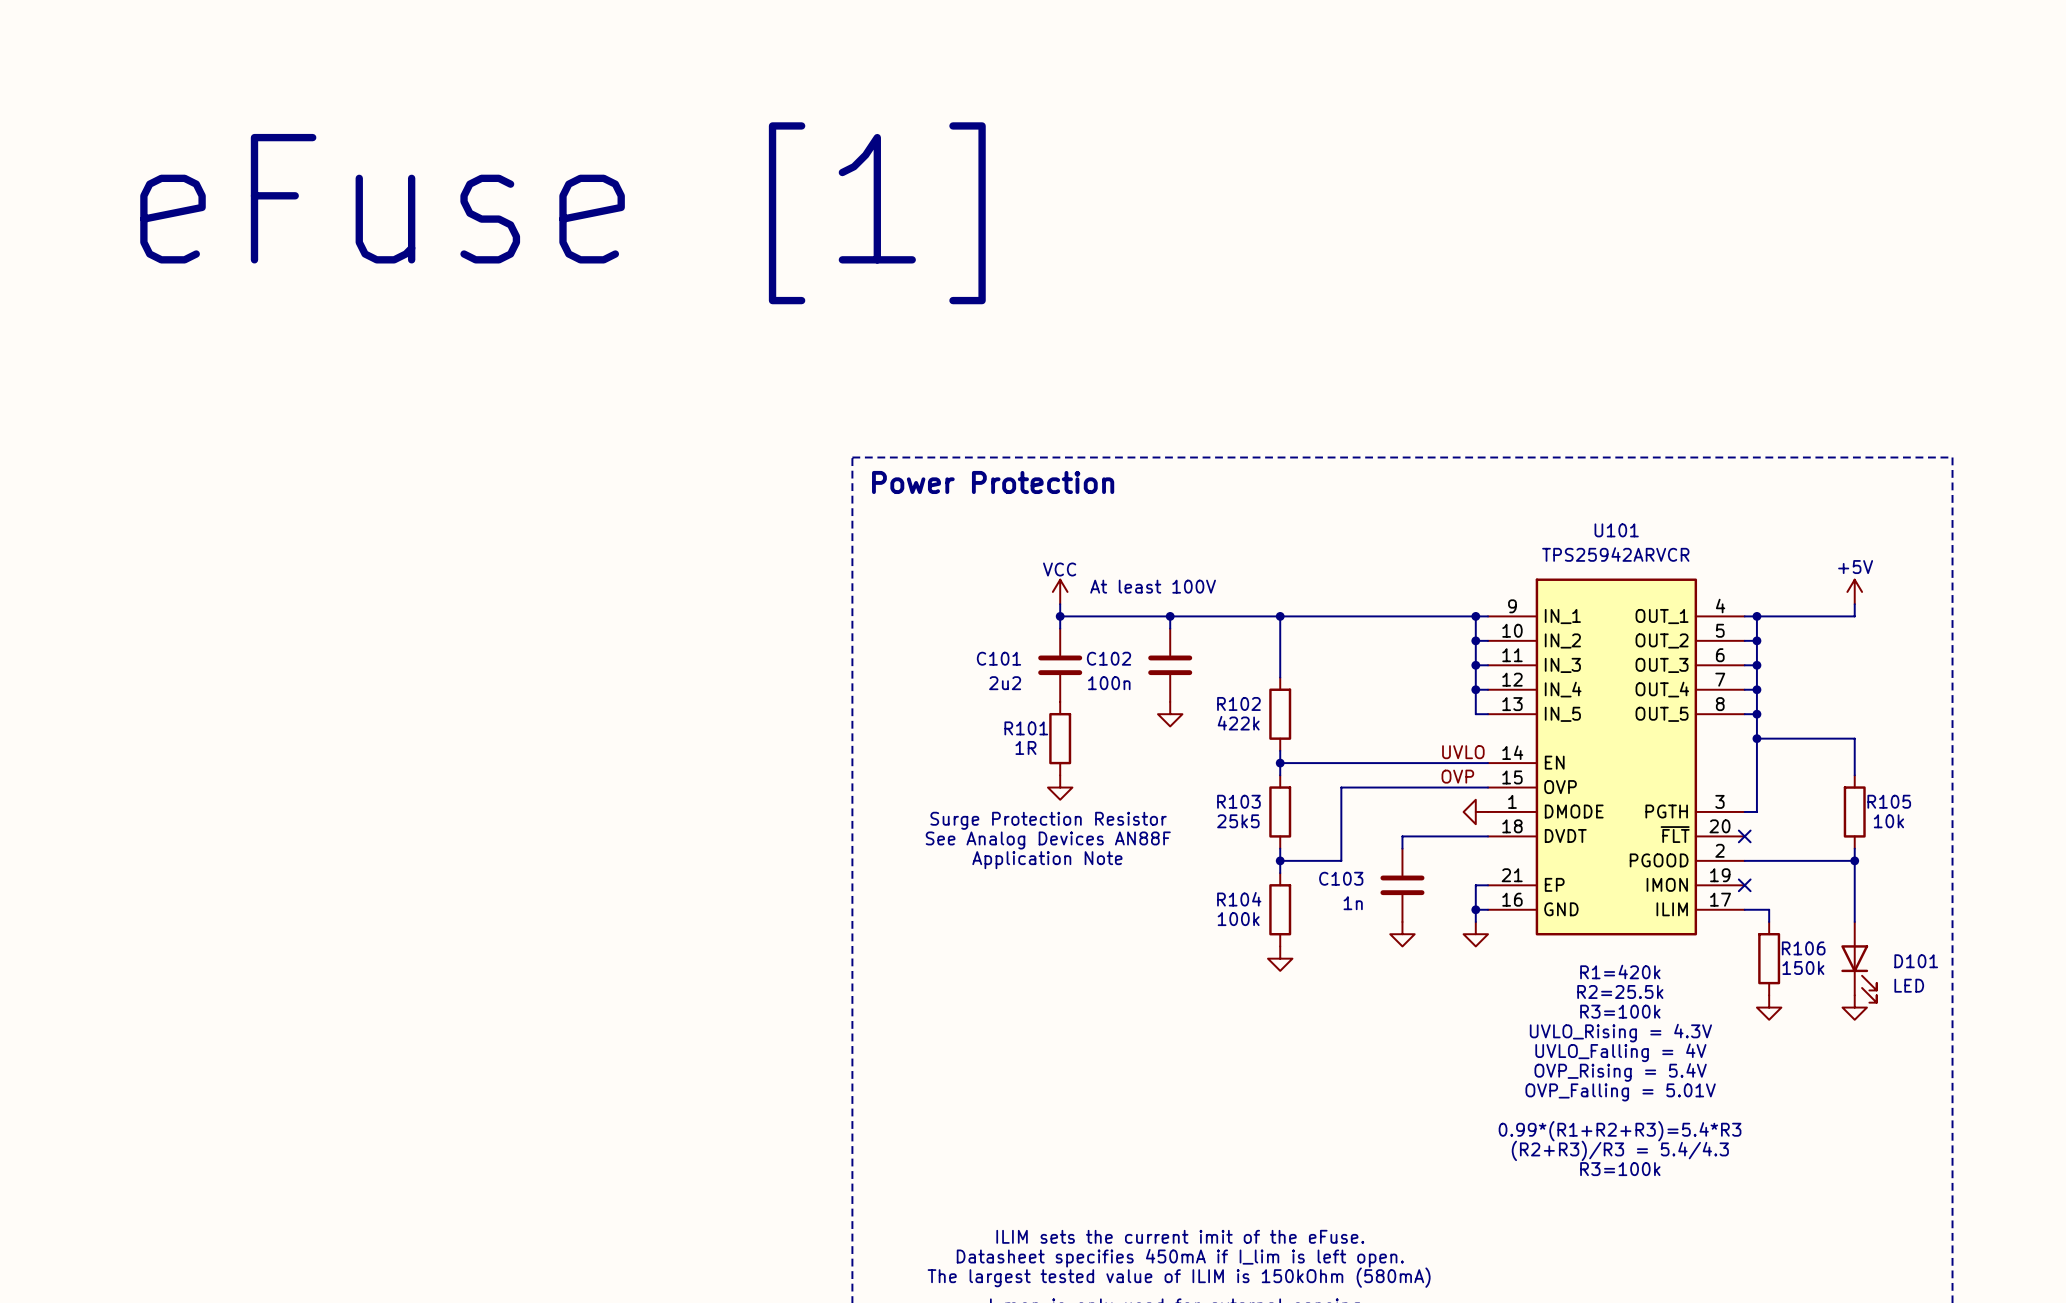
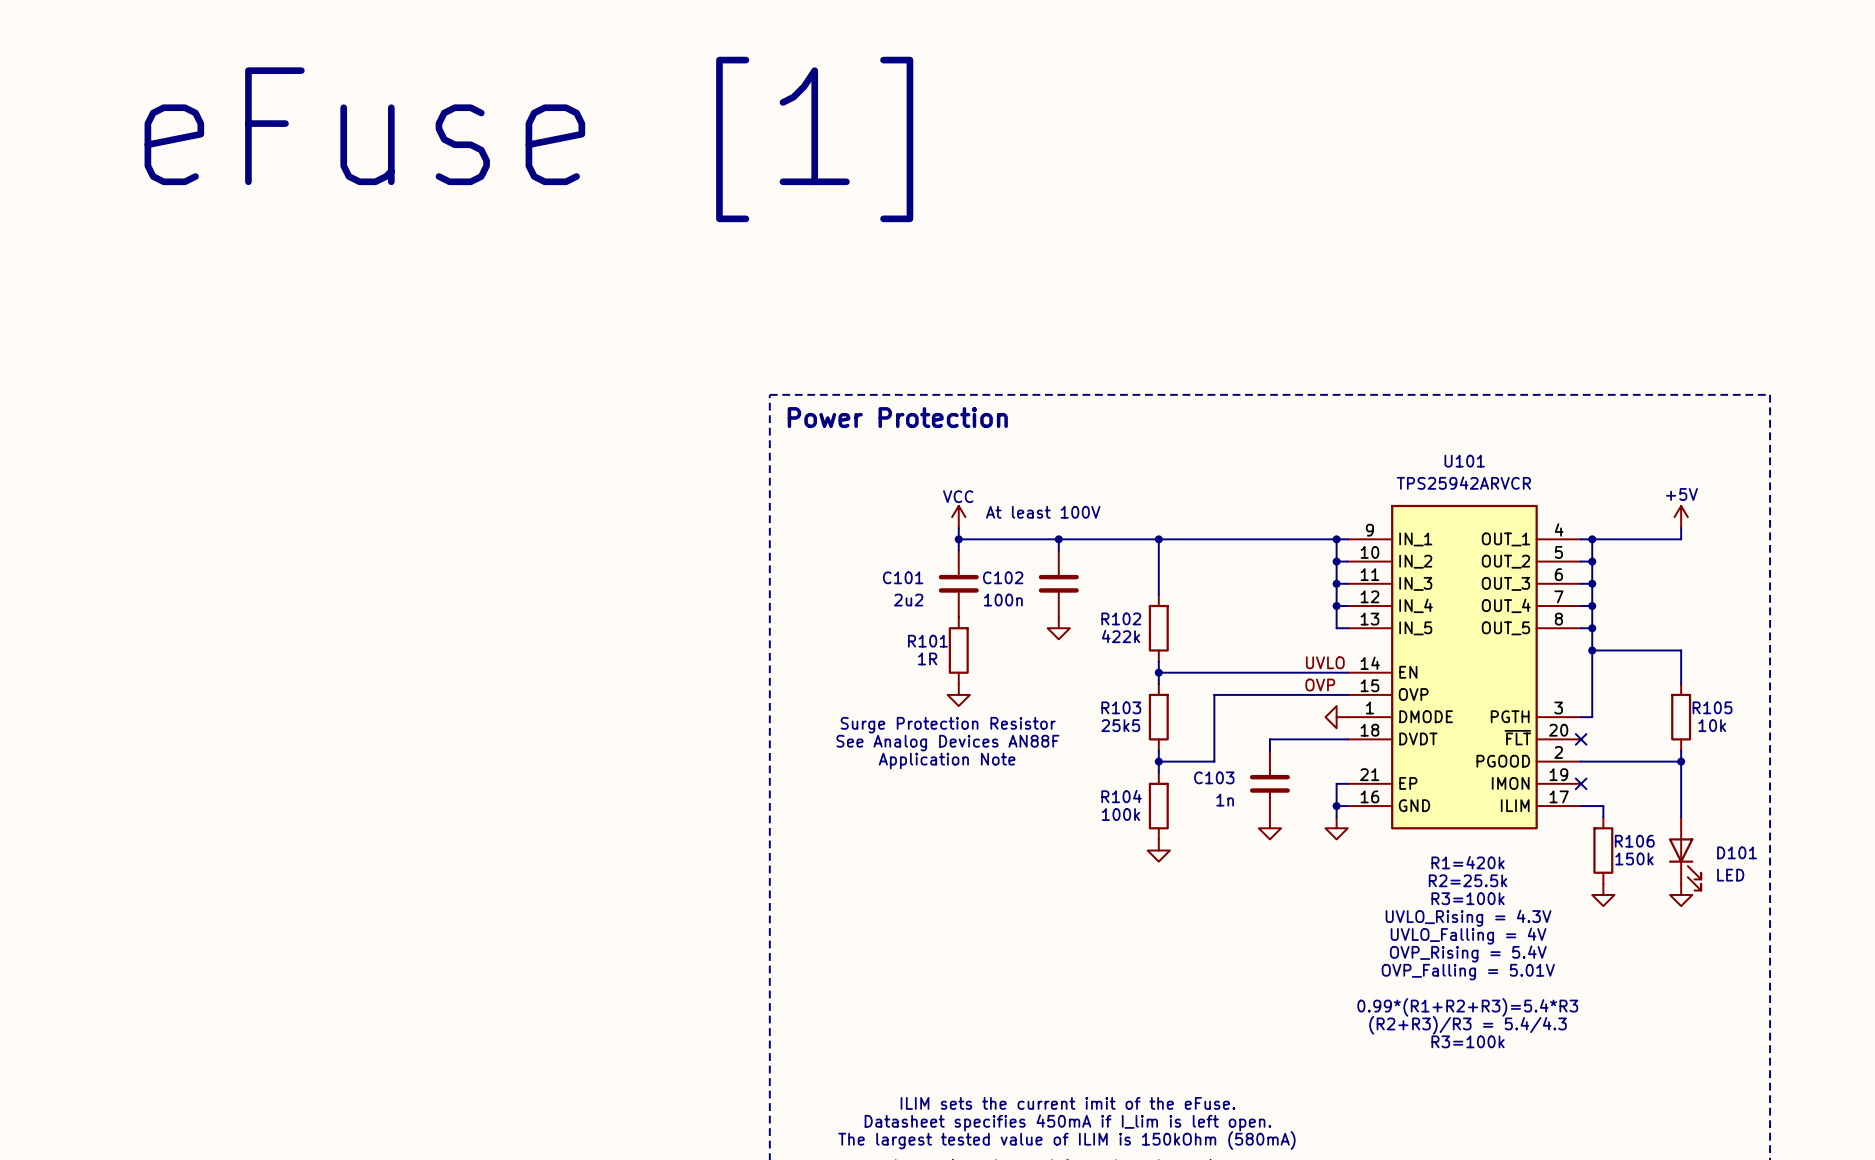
text position: eFuse [1] (562, 213) -> eFuse [1] (528, 139)

